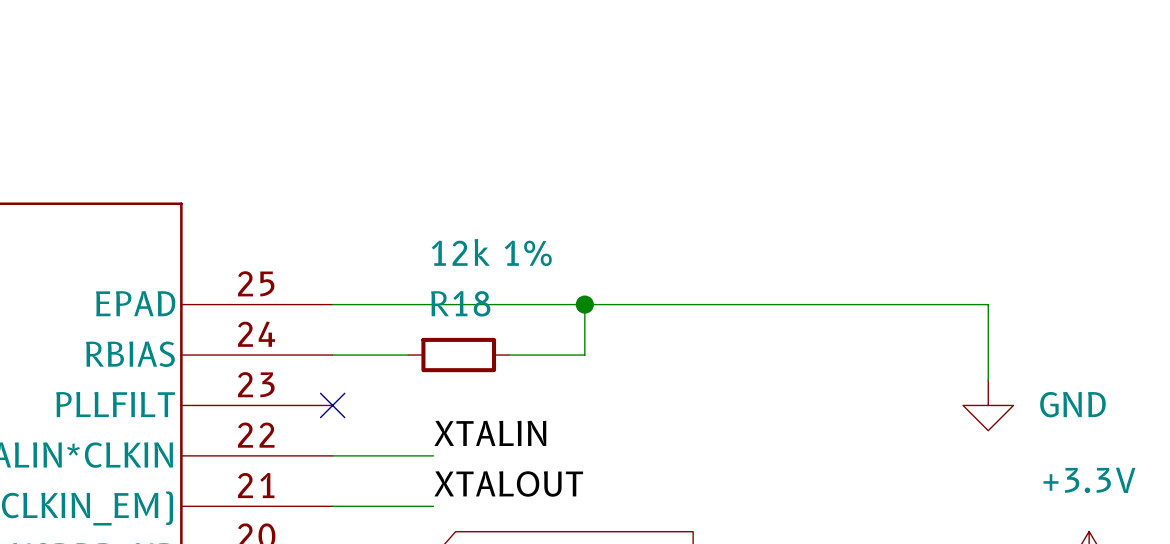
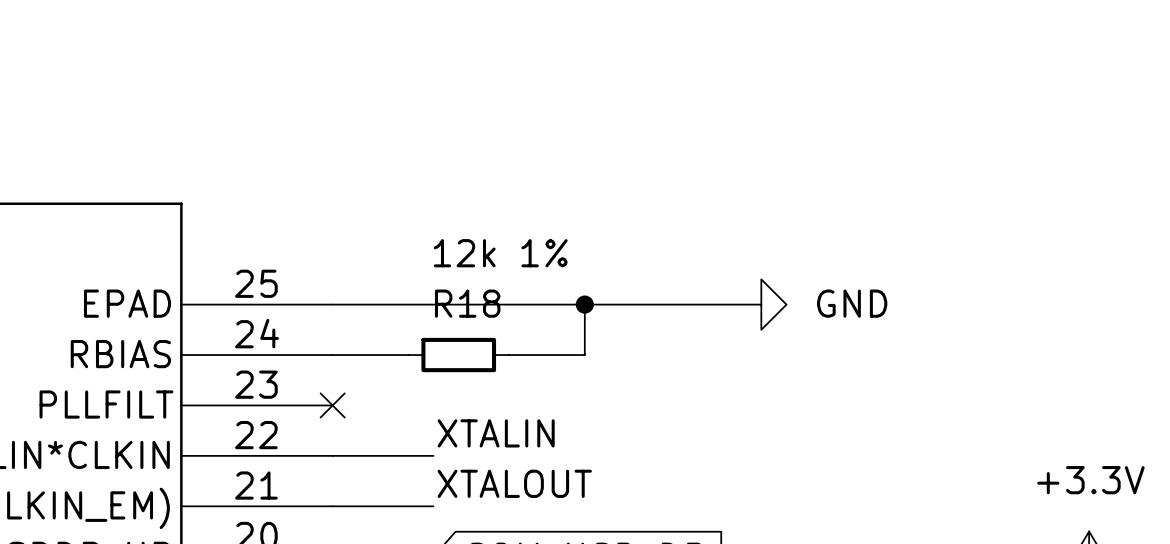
wire: (736, 304) (988, 304) (988, 380) -> none
power symbol rotation: 0° (988, 405) -> 90° counterclockwise (761, 304)
power symbol position: GND (988, 405) -> GND (761, 304)

